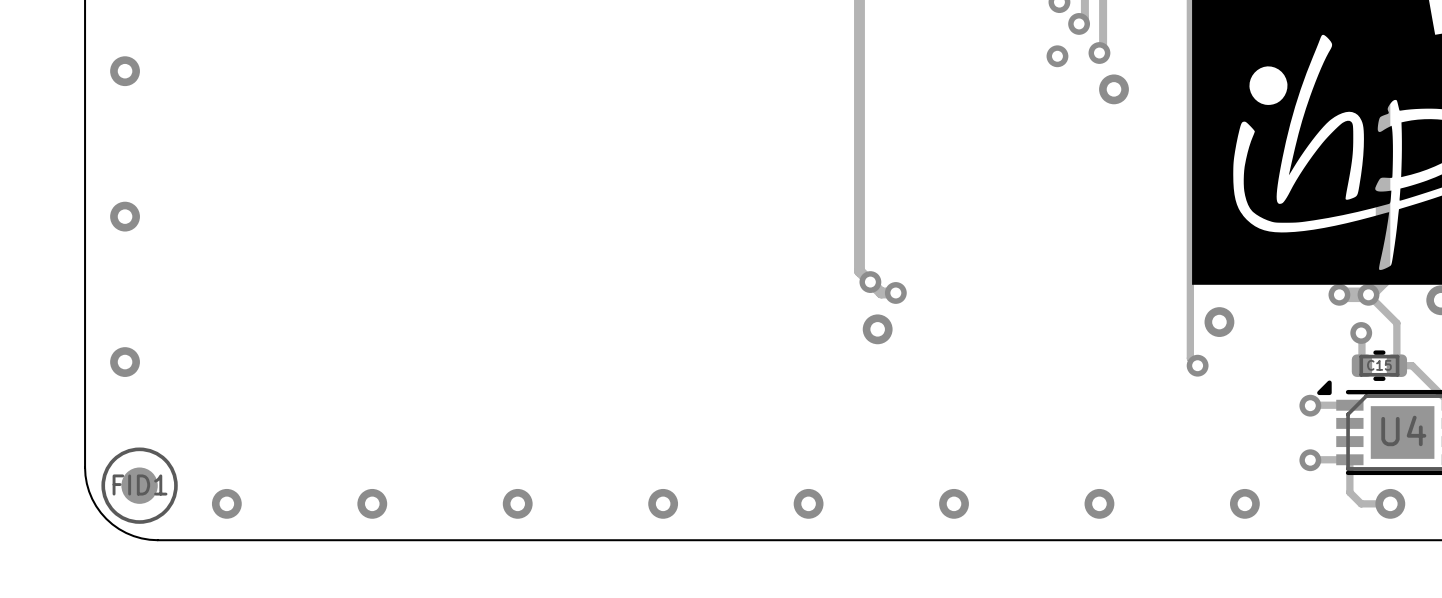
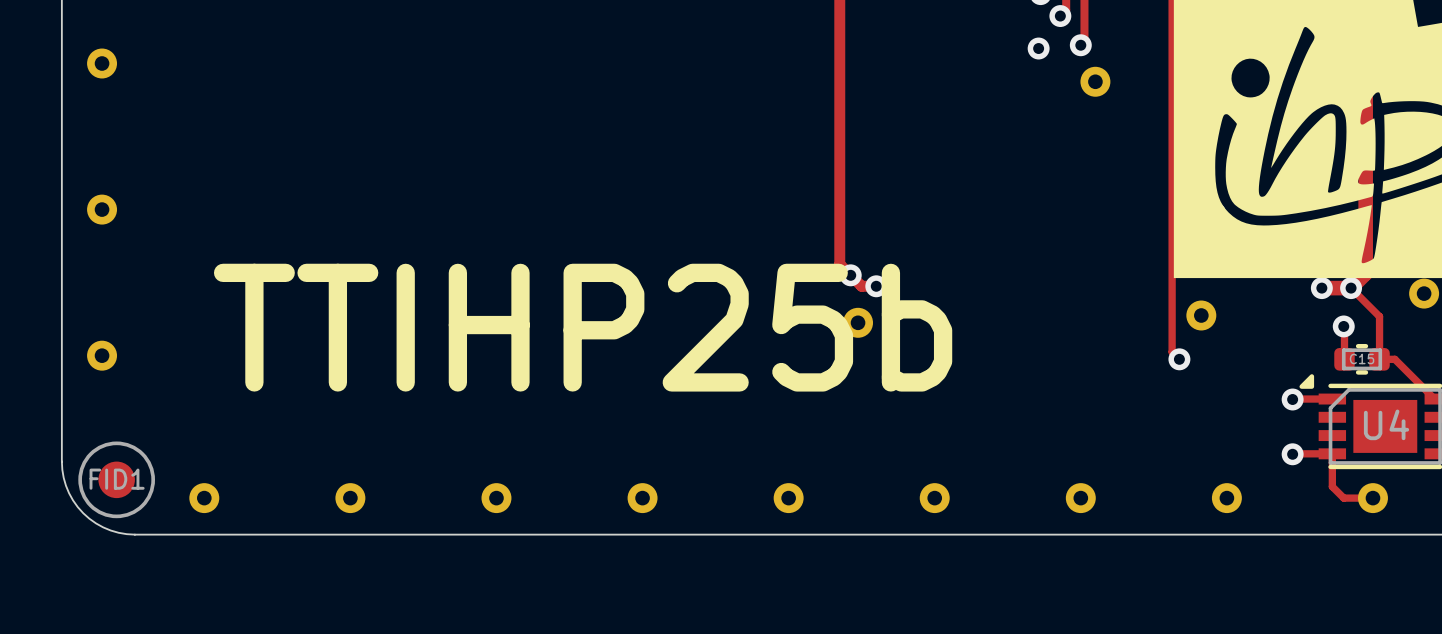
text: none -> TTIHP25b (583, 327)

